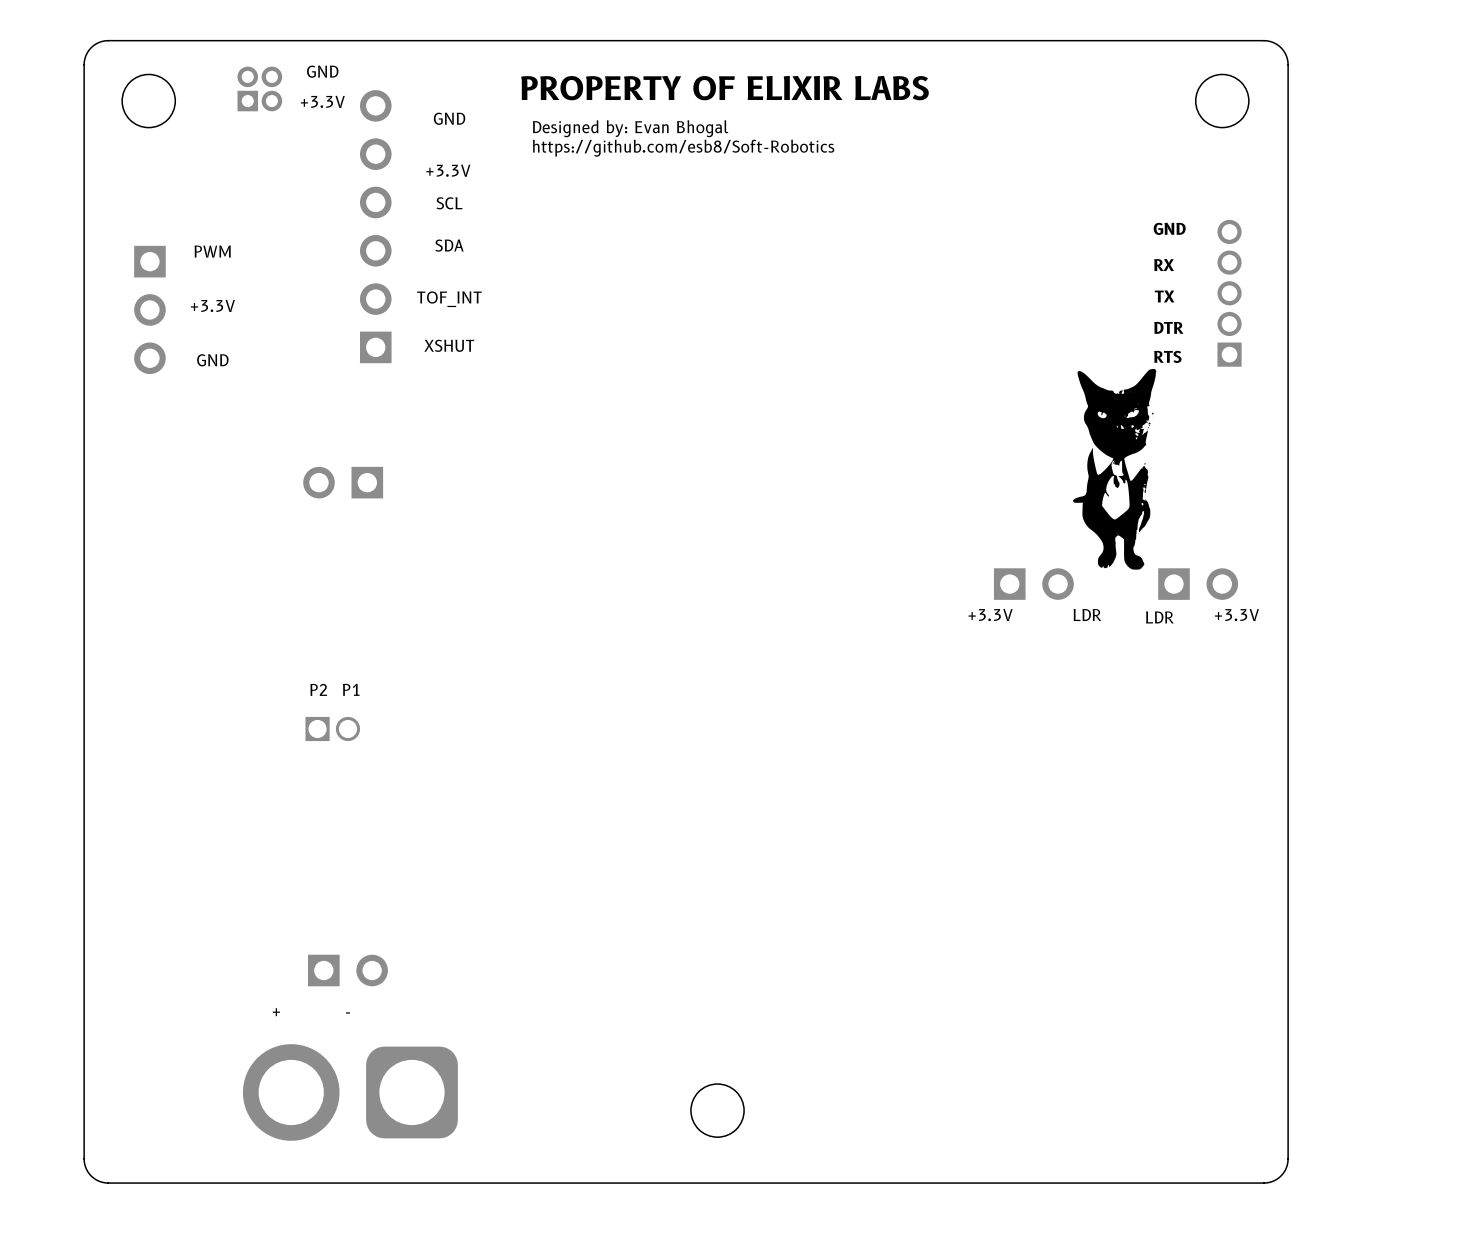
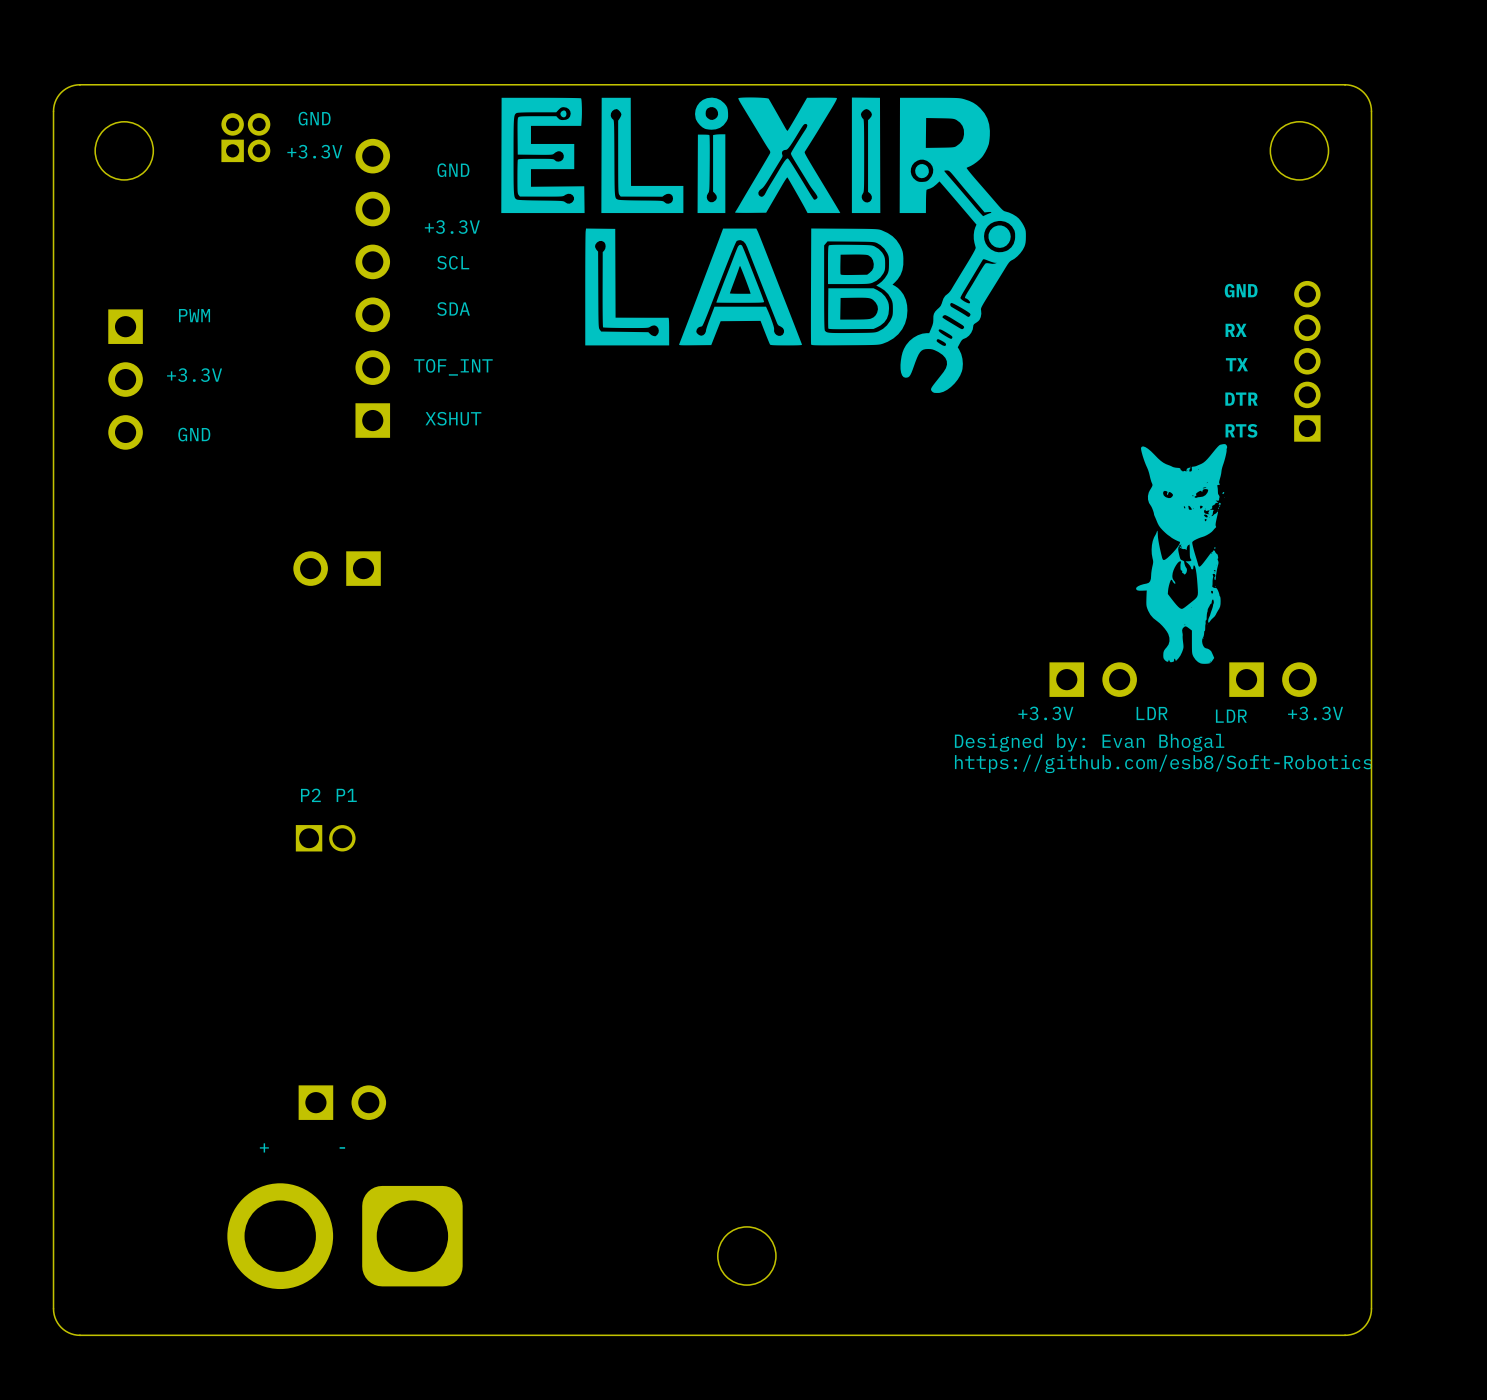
drawing: none -> [501, 97, 1026, 393]
text: PROPERTY OF ELIXIR LABS (724, 88) -> none
text: Designed by: Evan Bhogal (630, 128) -> none
text: https://github.com/esb8/Soft-Robotics (683, 148) -> none
text: none -> Designed by: Evan Bhogal (1089, 742)
text: none -> https://github.com/esb8/Soft-Robotics (1163, 763)

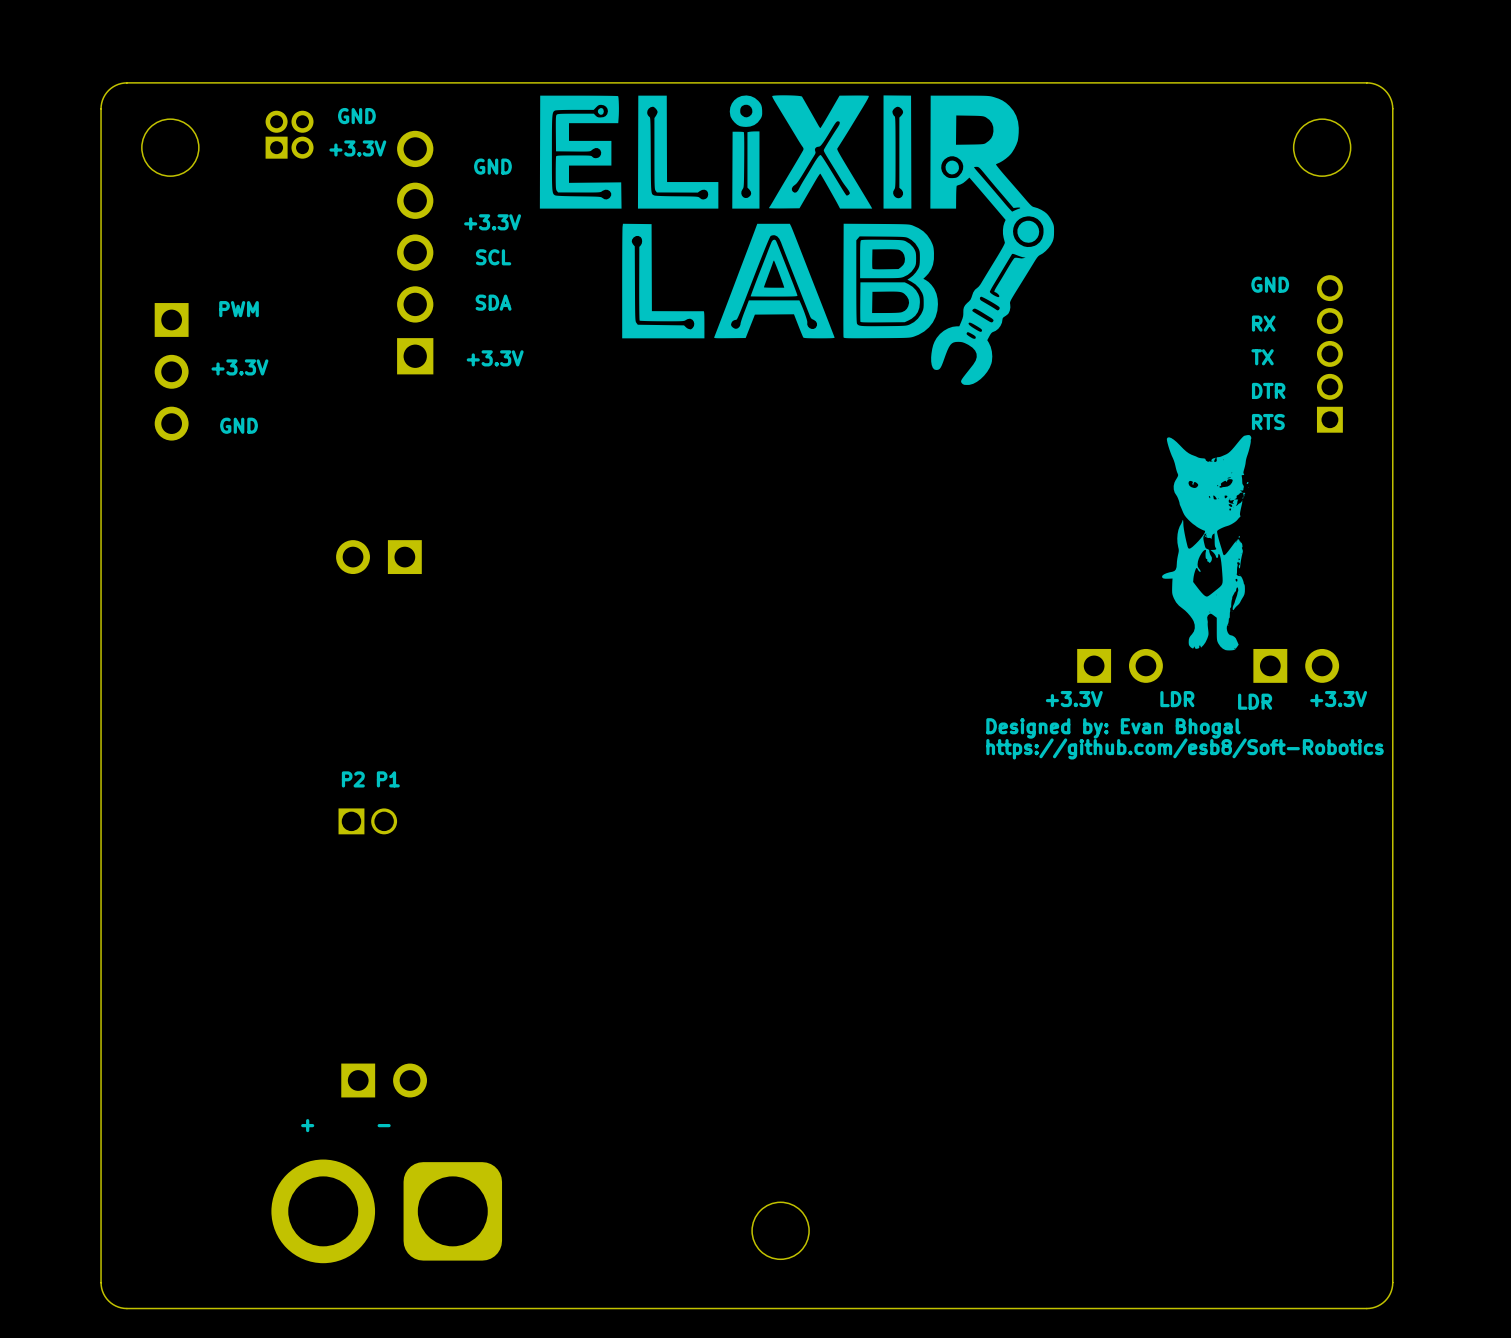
part: none -> (415, 252)
part: (372, 288) -> none
text: TOF_INT (453, 367) -> +3.3V (495, 358)
text: XSHUT (453, 418) -> none

